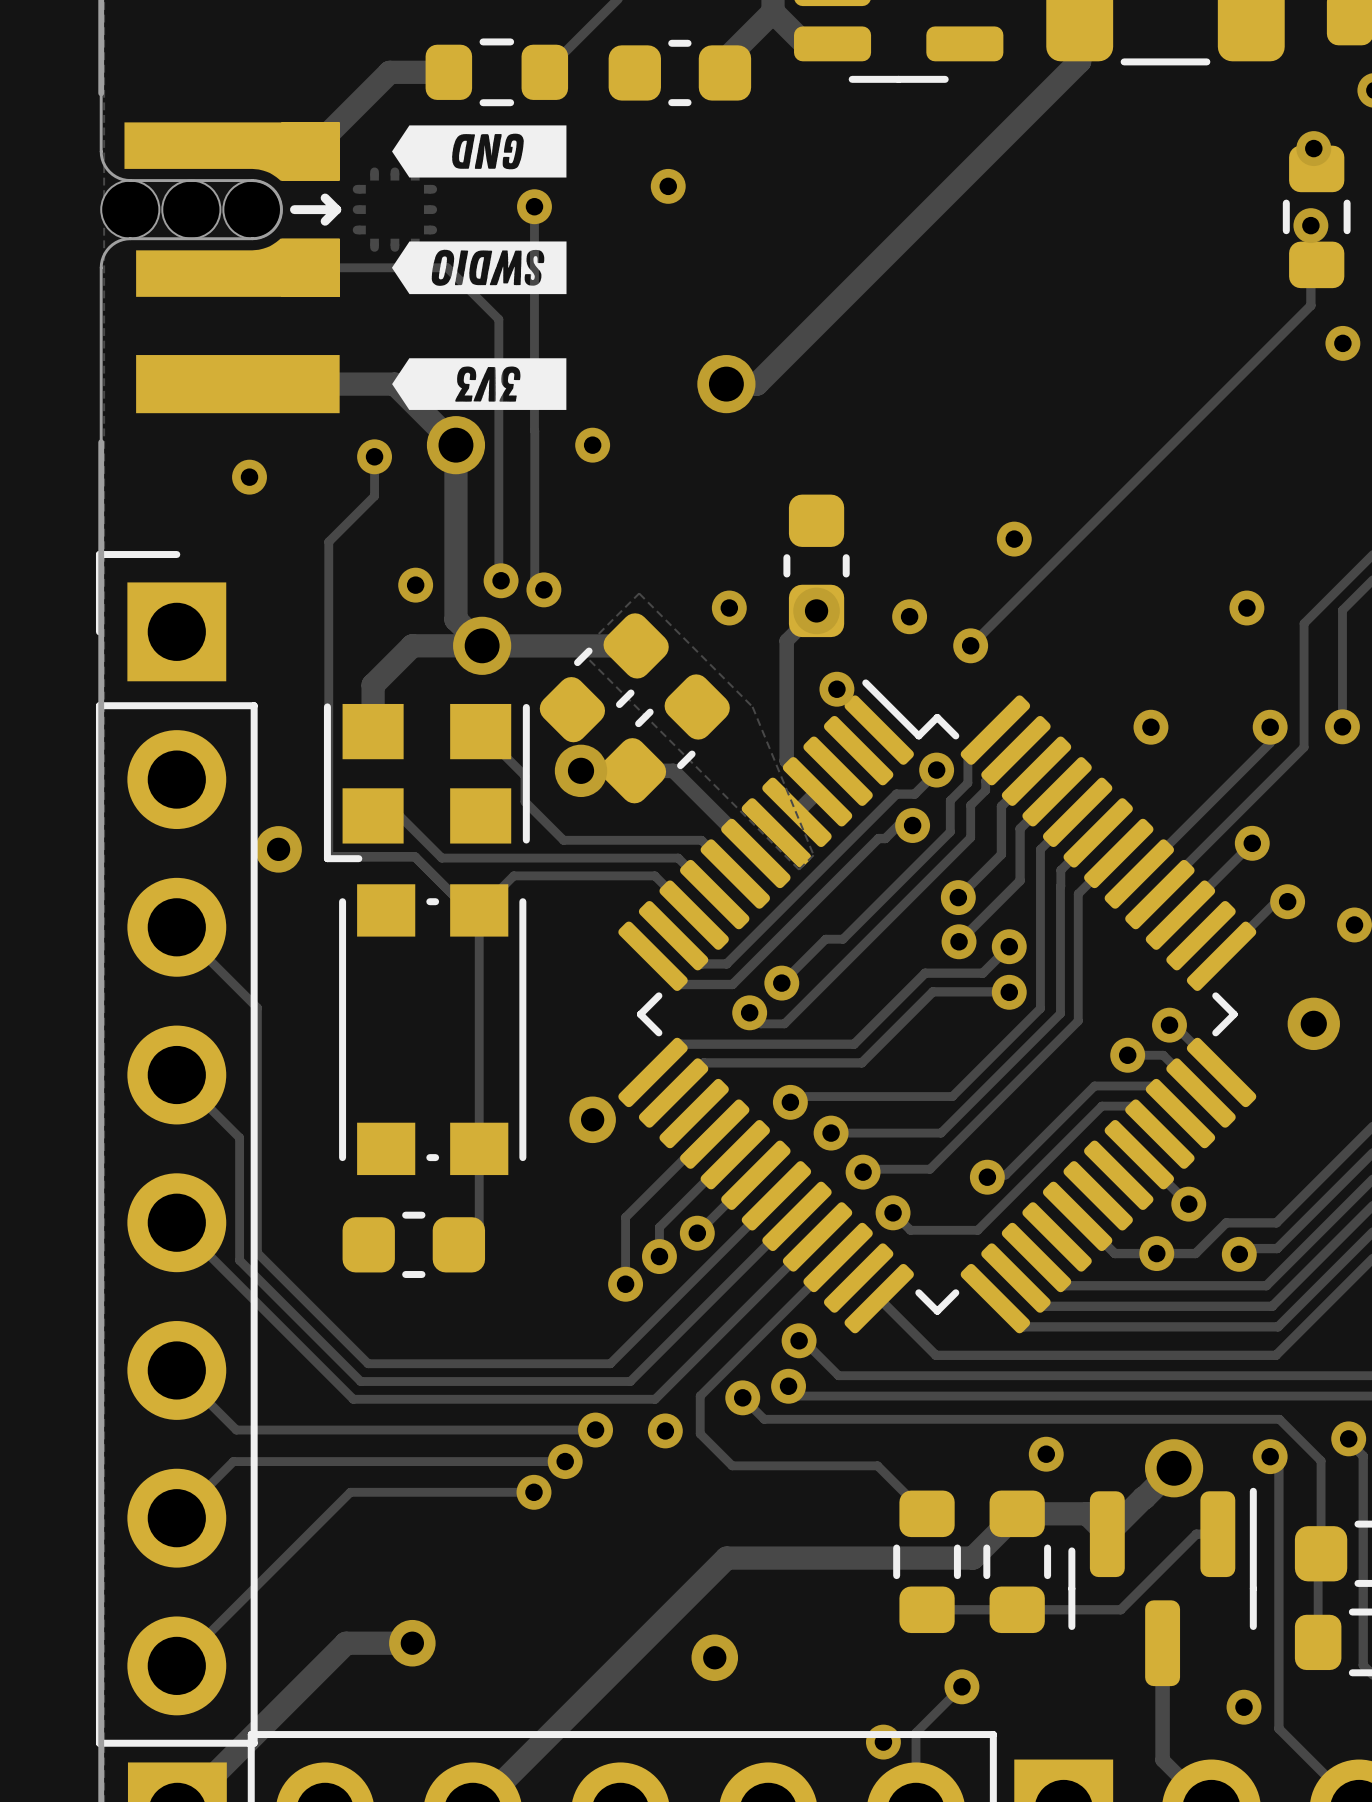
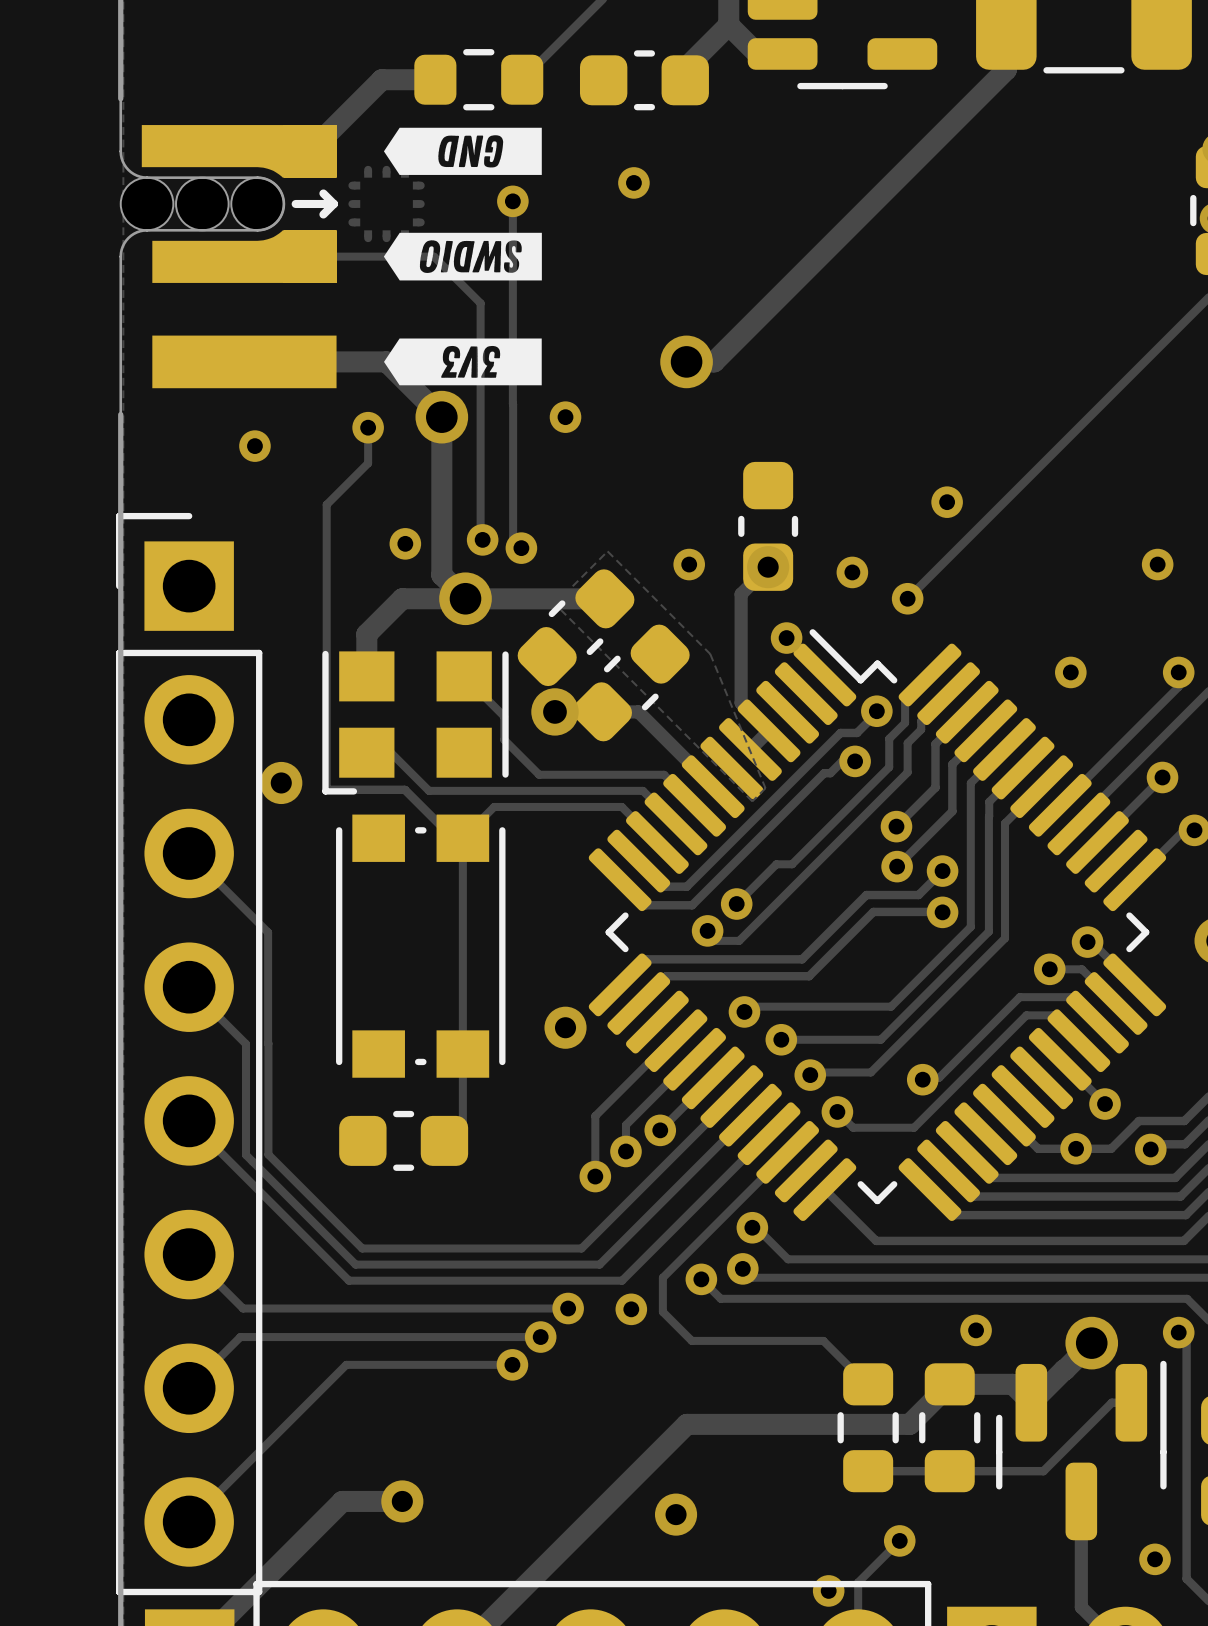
track: (257, 1007) (257, 1253) (264, 1260) -> (262, 926) (268, 932) (268, 1043)
track: none -> (268, 1043) (268, 1154)

